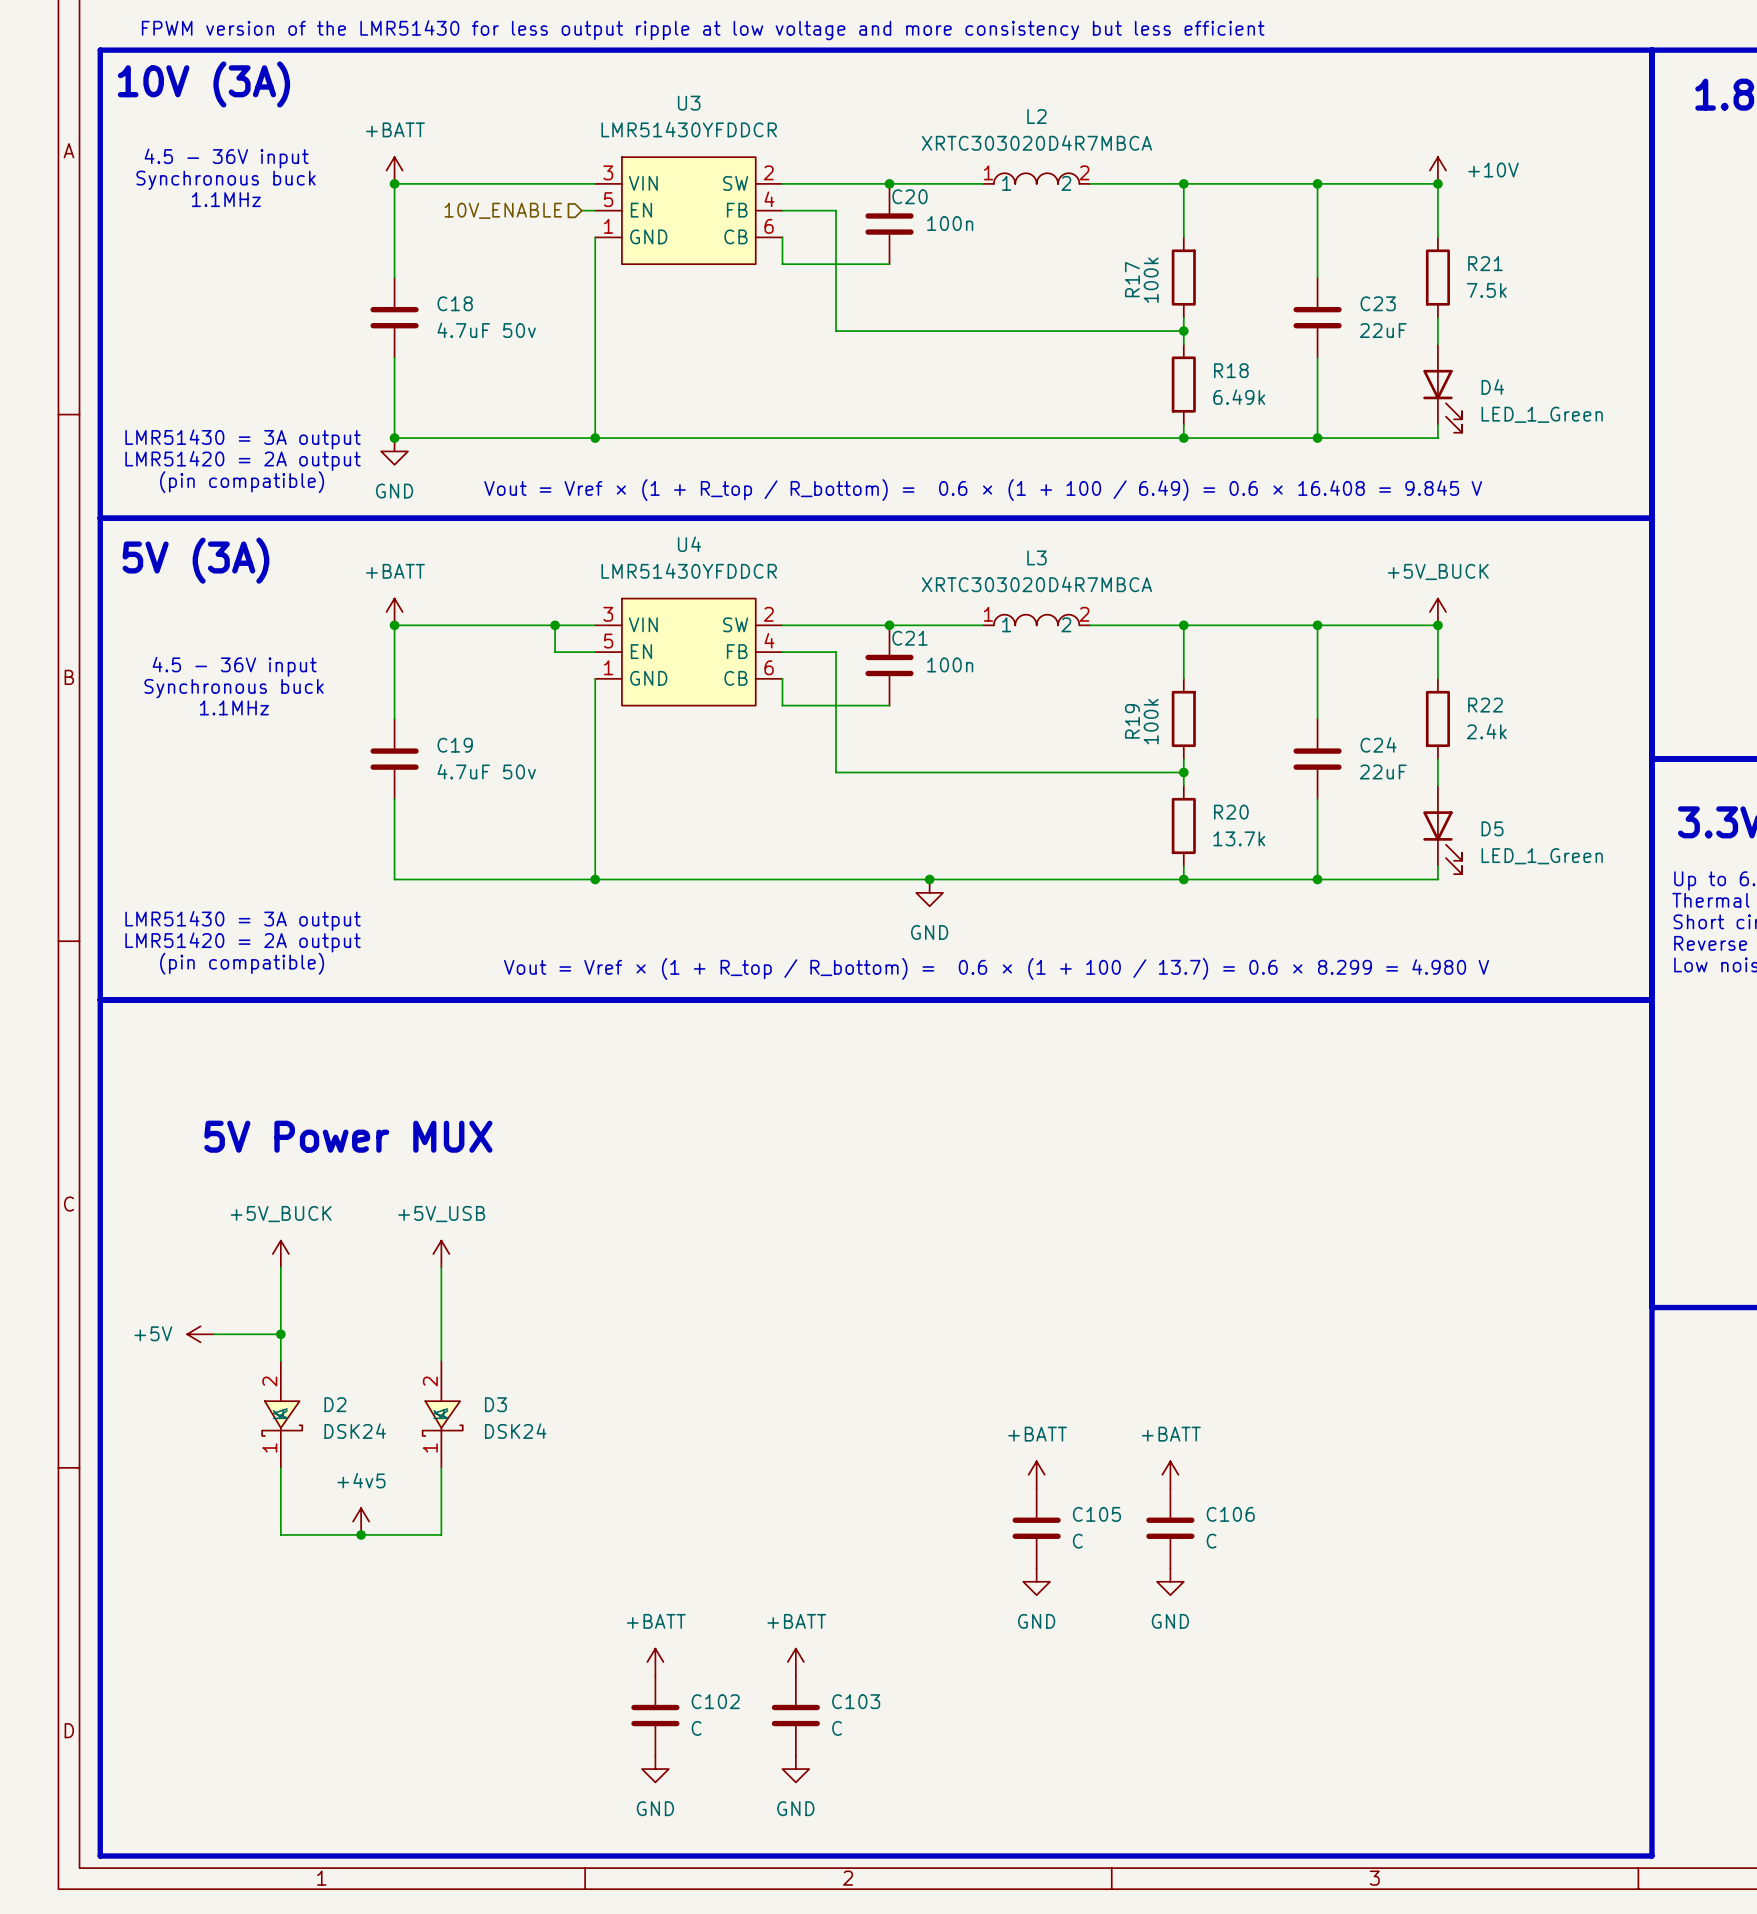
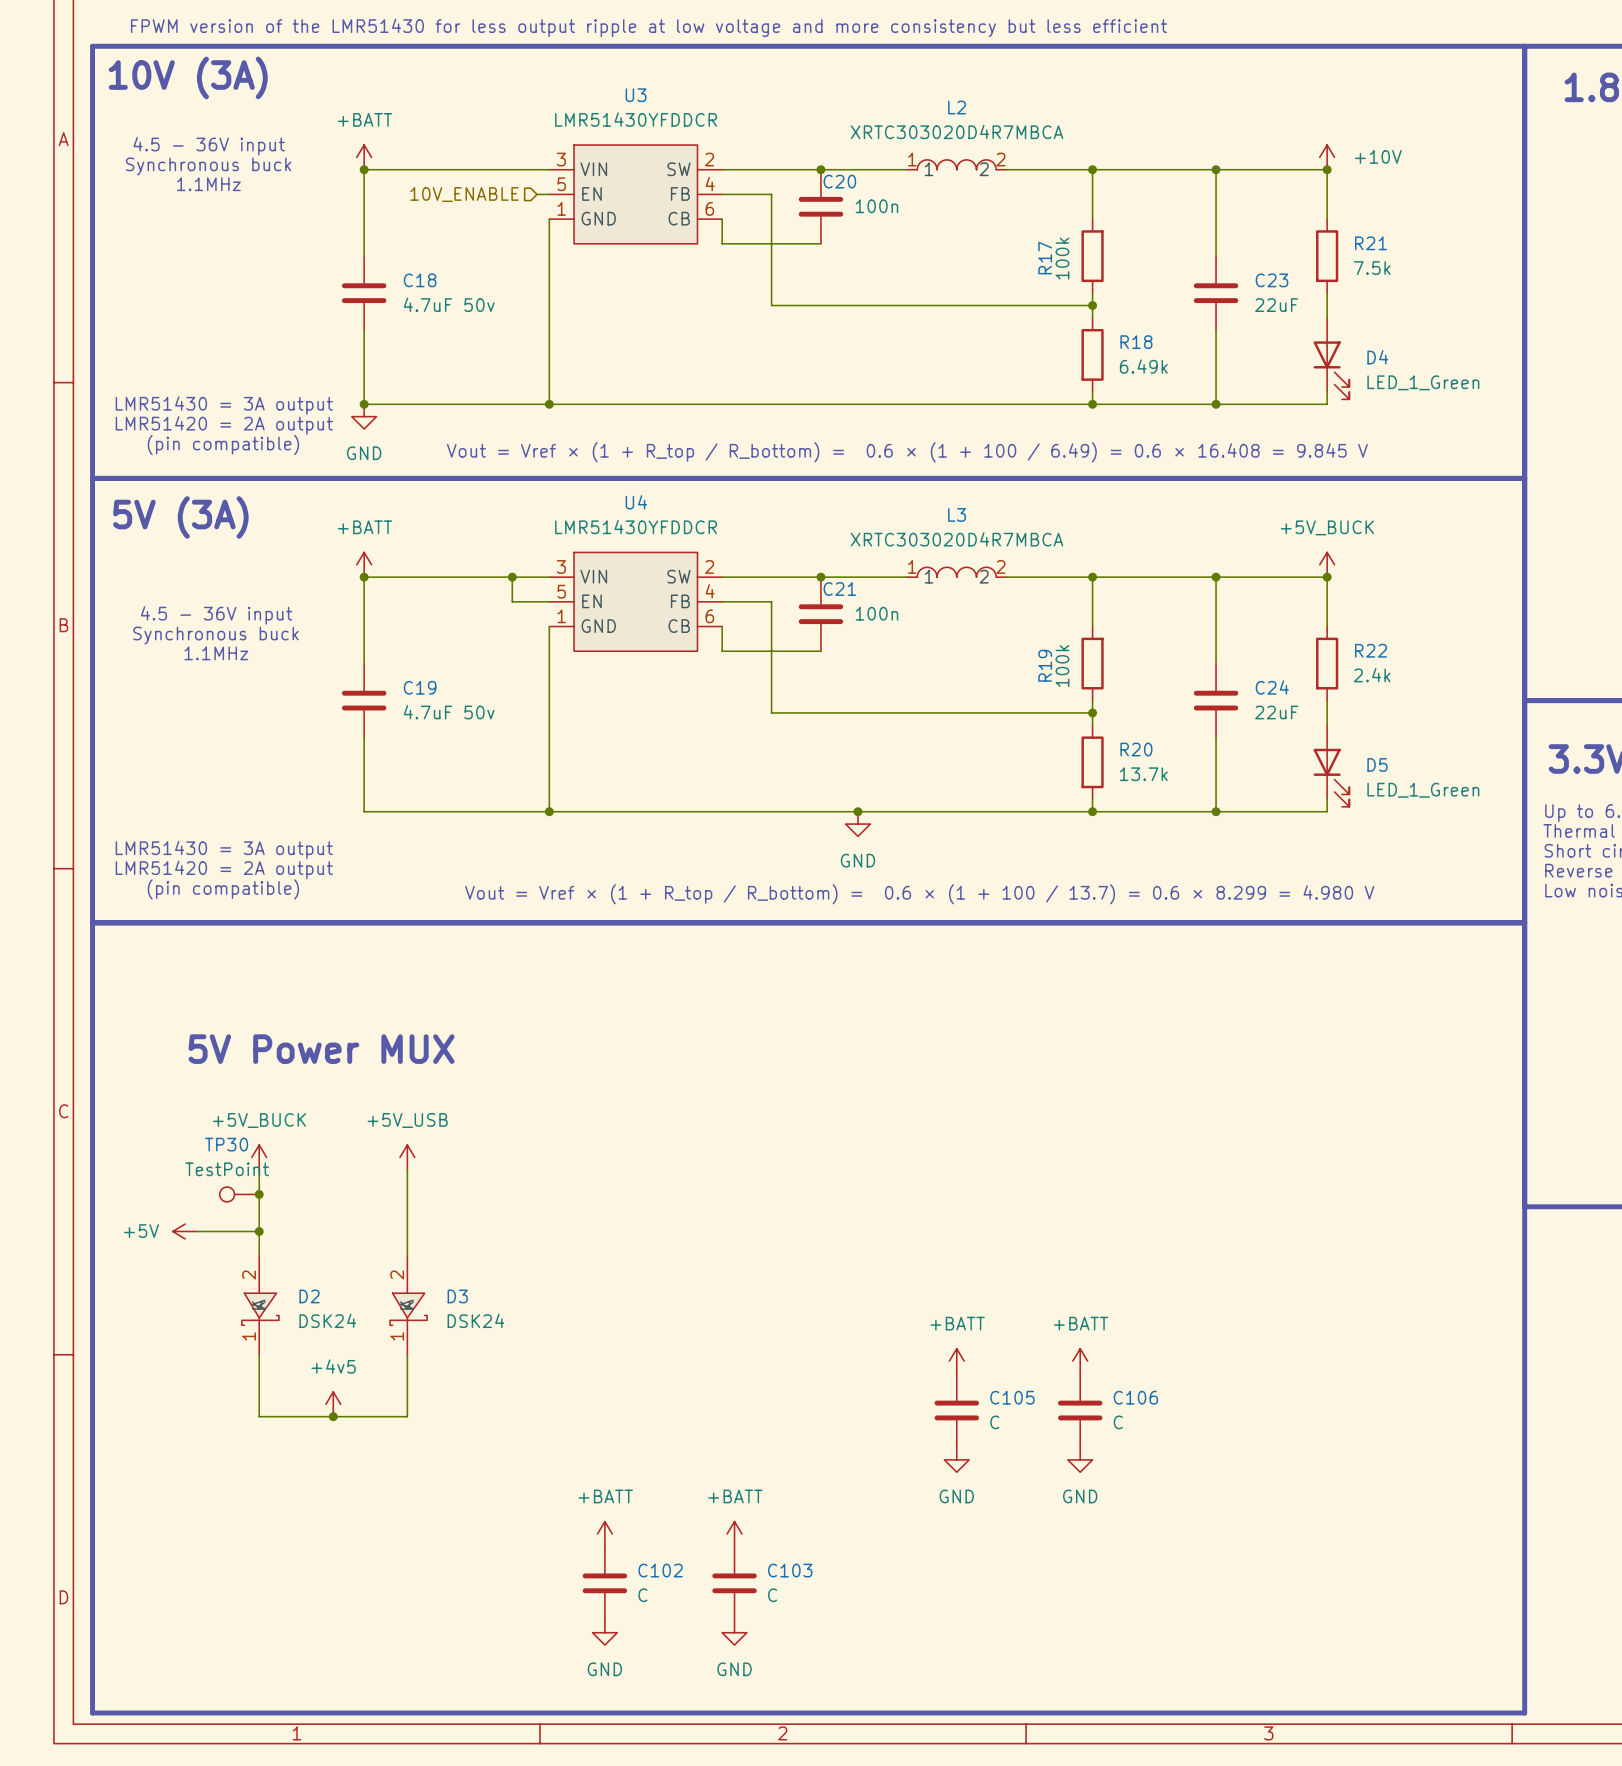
TP30: none -> TestPoint (239, 1194)
junction: none -> (259, 1194)

